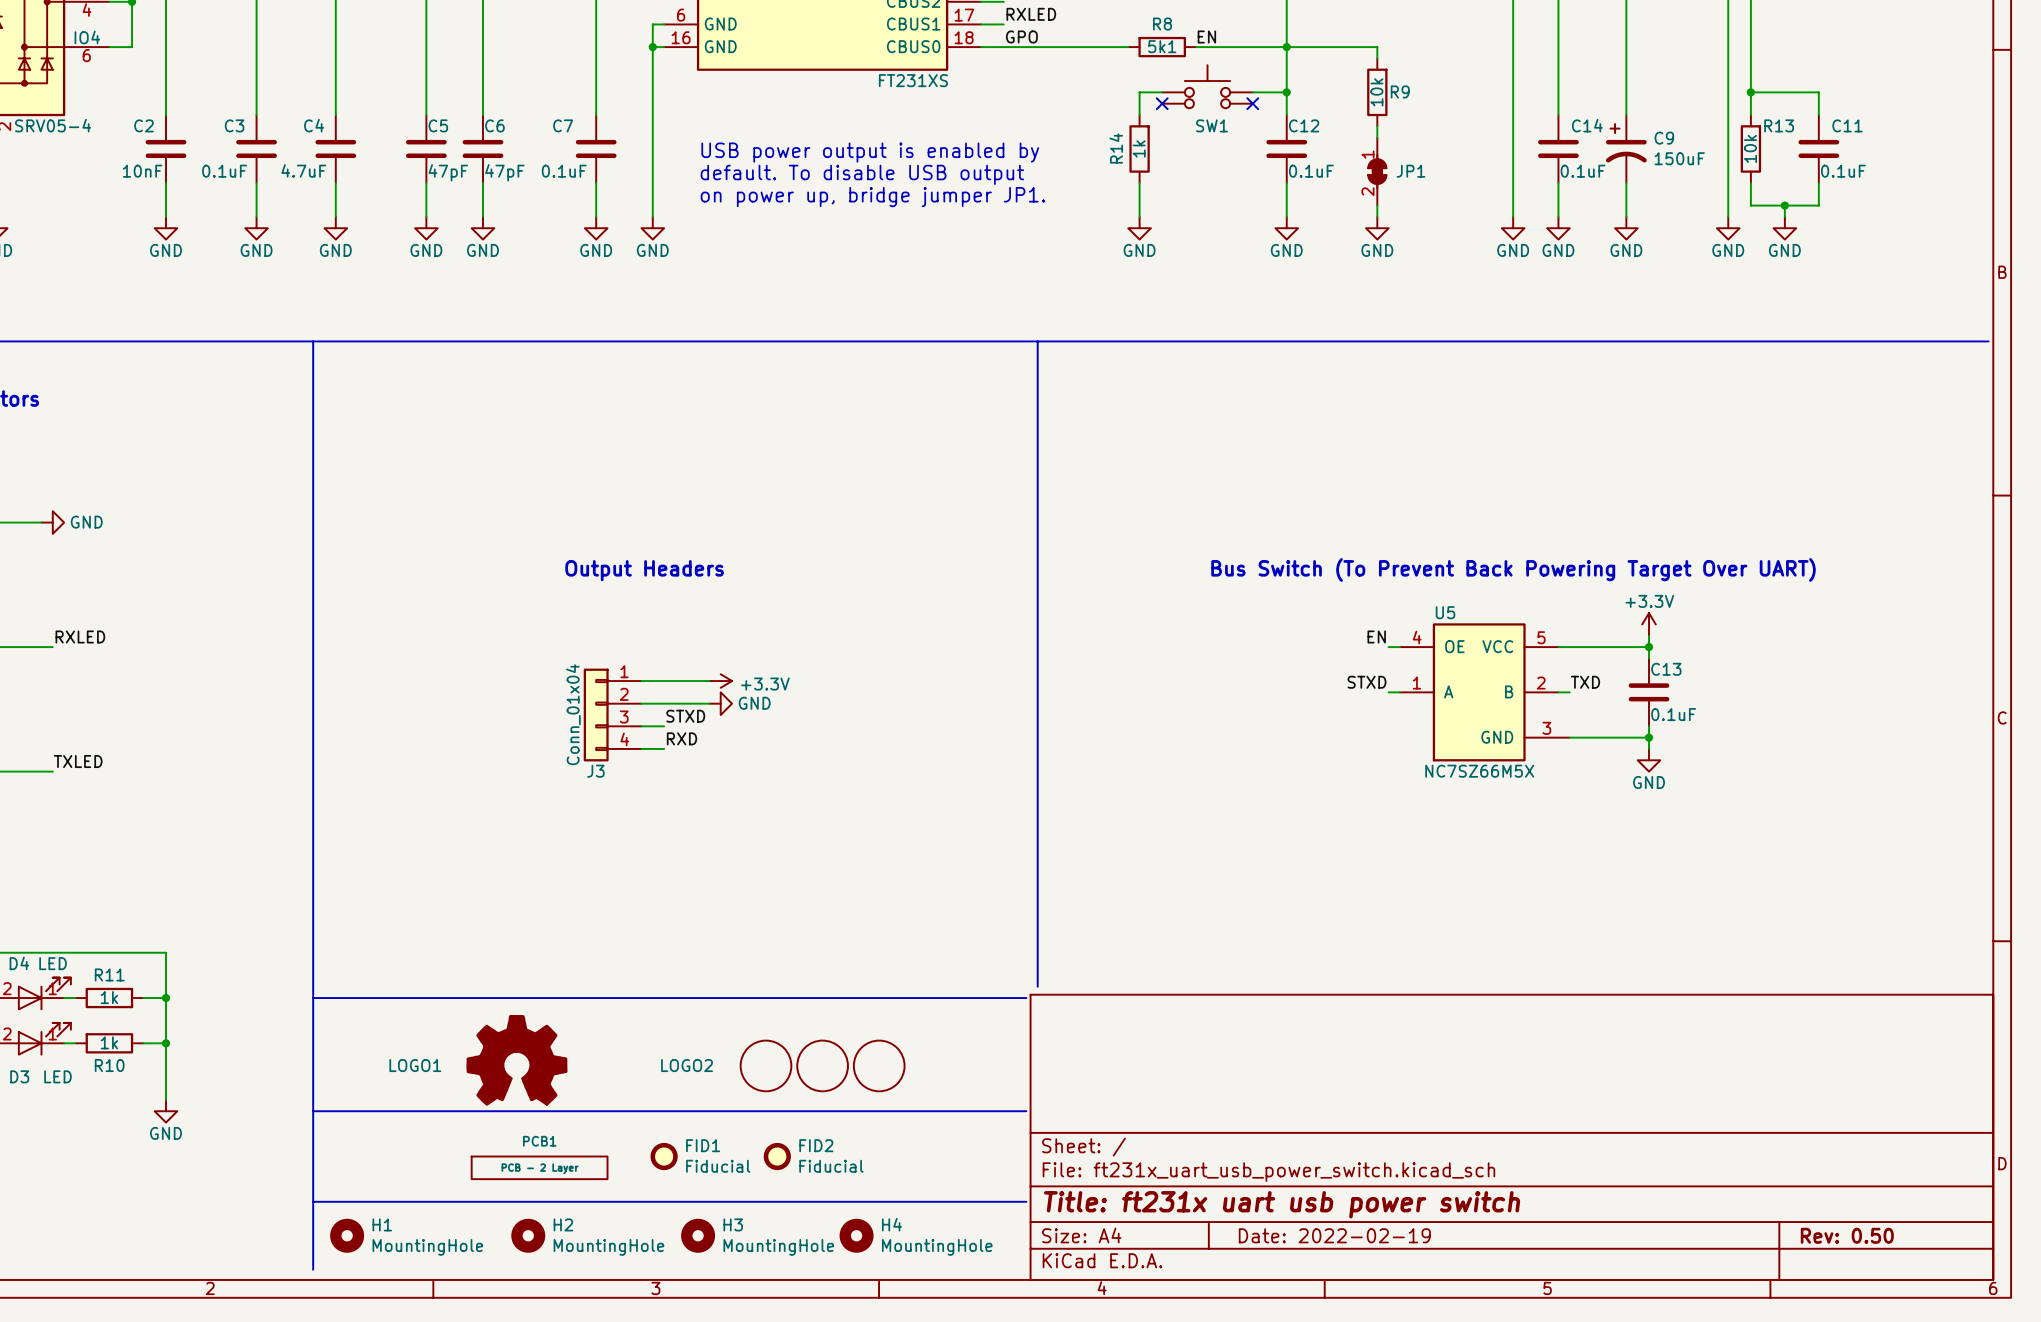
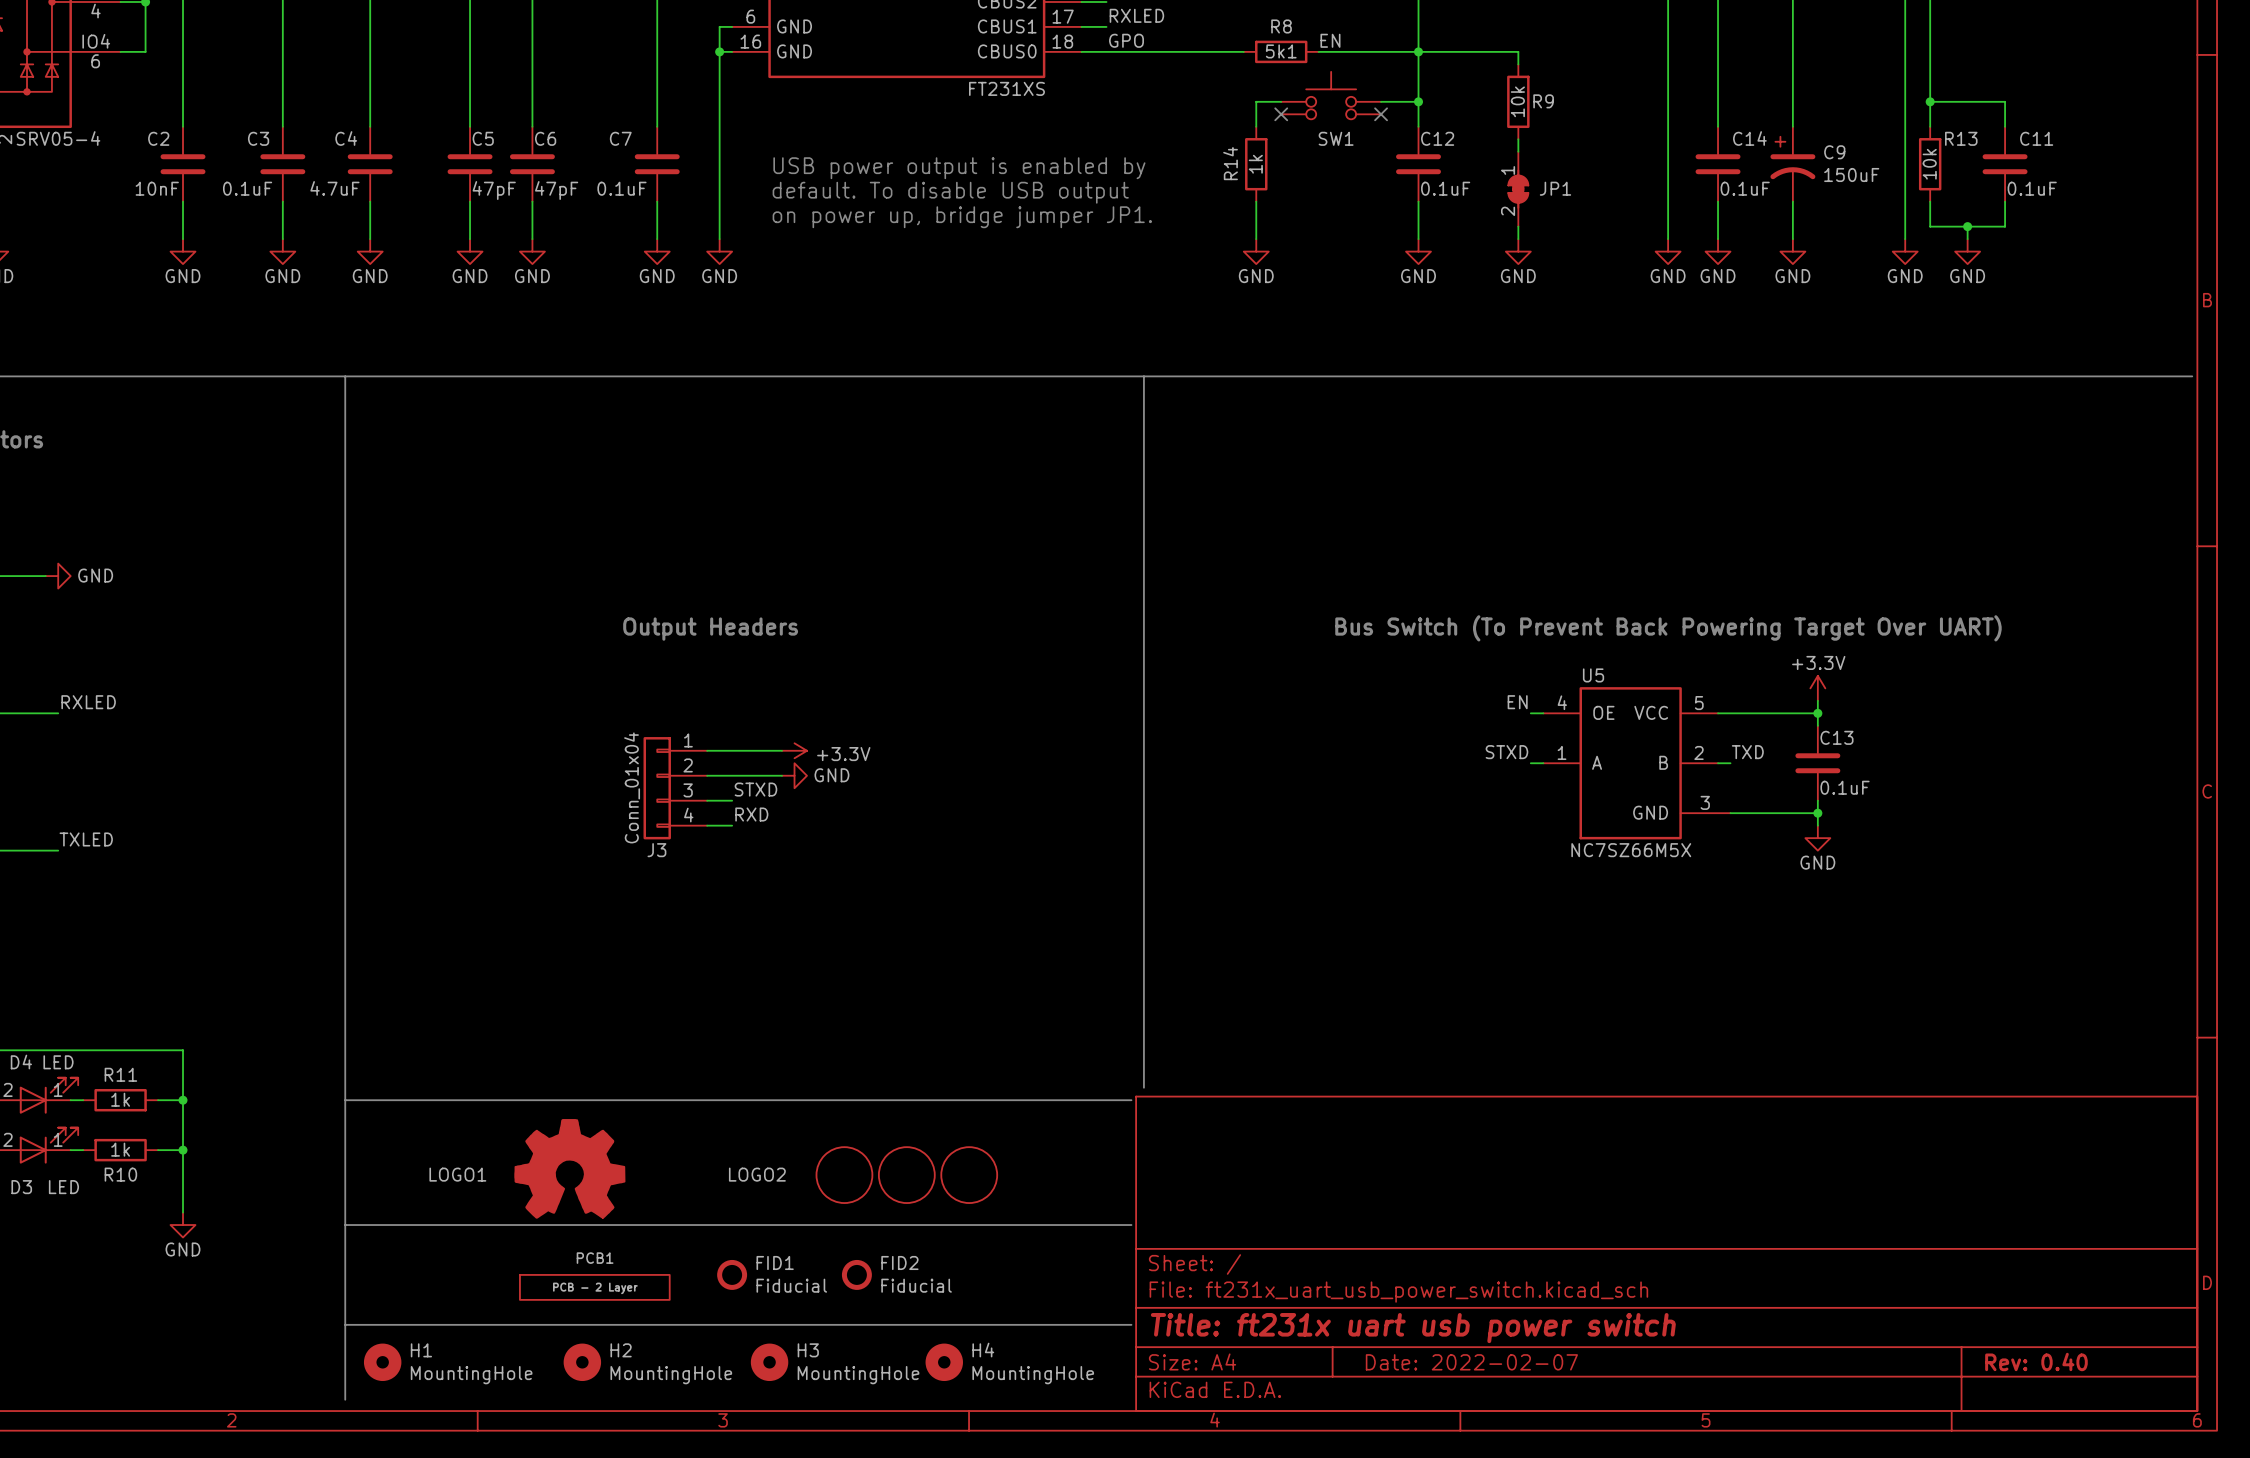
title block: Date: 2022-02-19 (1334, 1235) -> Date: 2022-02-07 (1471, 1362)
title block: Rev: 0.50 (1847, 1235) -> Rev: 0.40 (2036, 1361)

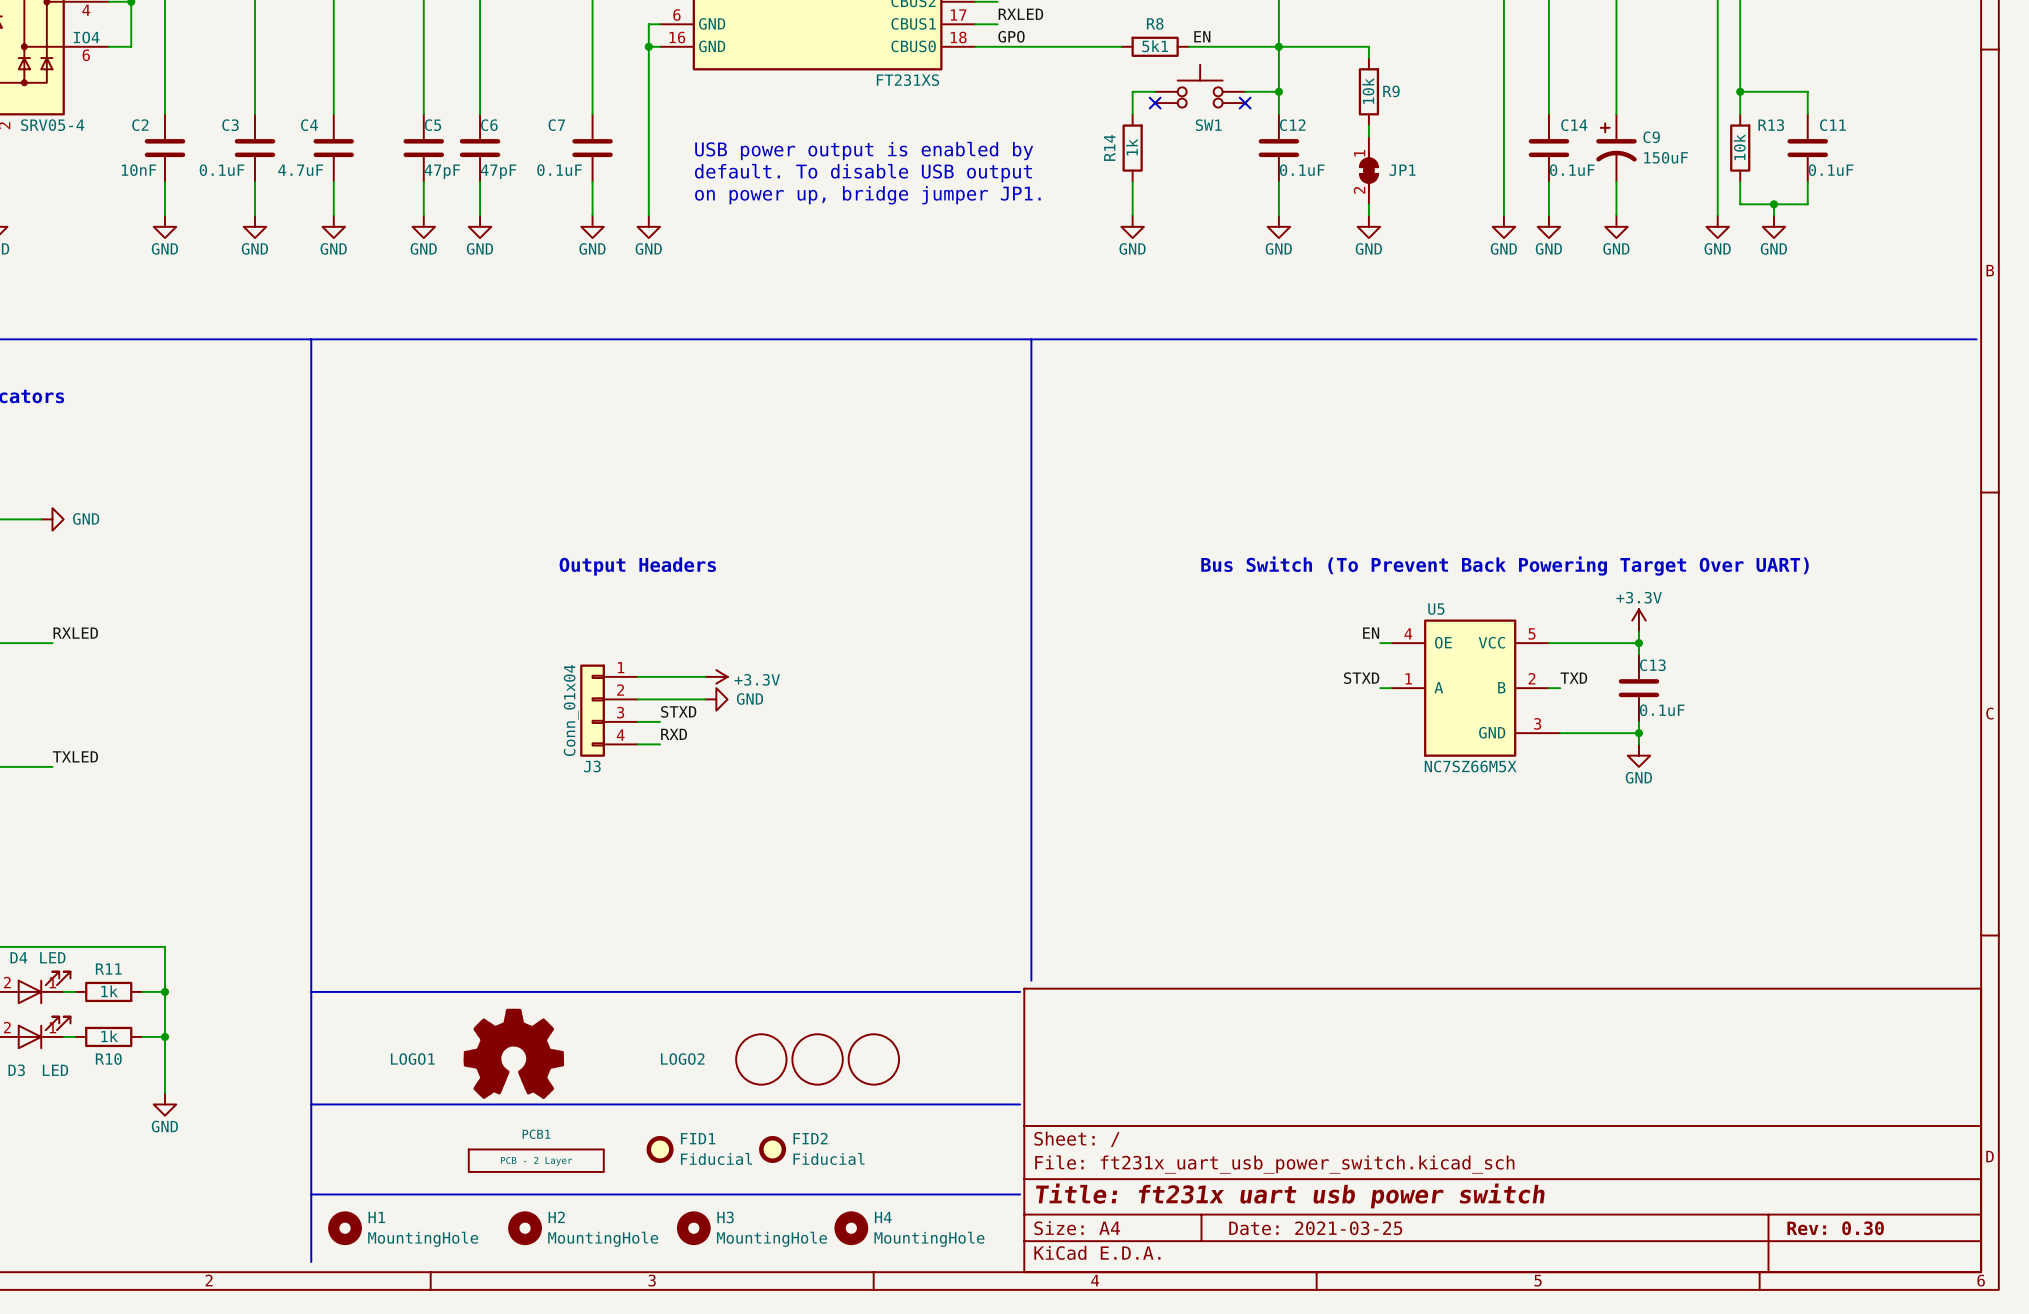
title block: Rev: 0.40 (2036, 1361) -> Rev: 0.30 (1835, 1228)
title block: Date: 2022-02-07 (1471, 1362) -> Date: 2021-03-25 (1315, 1228)

